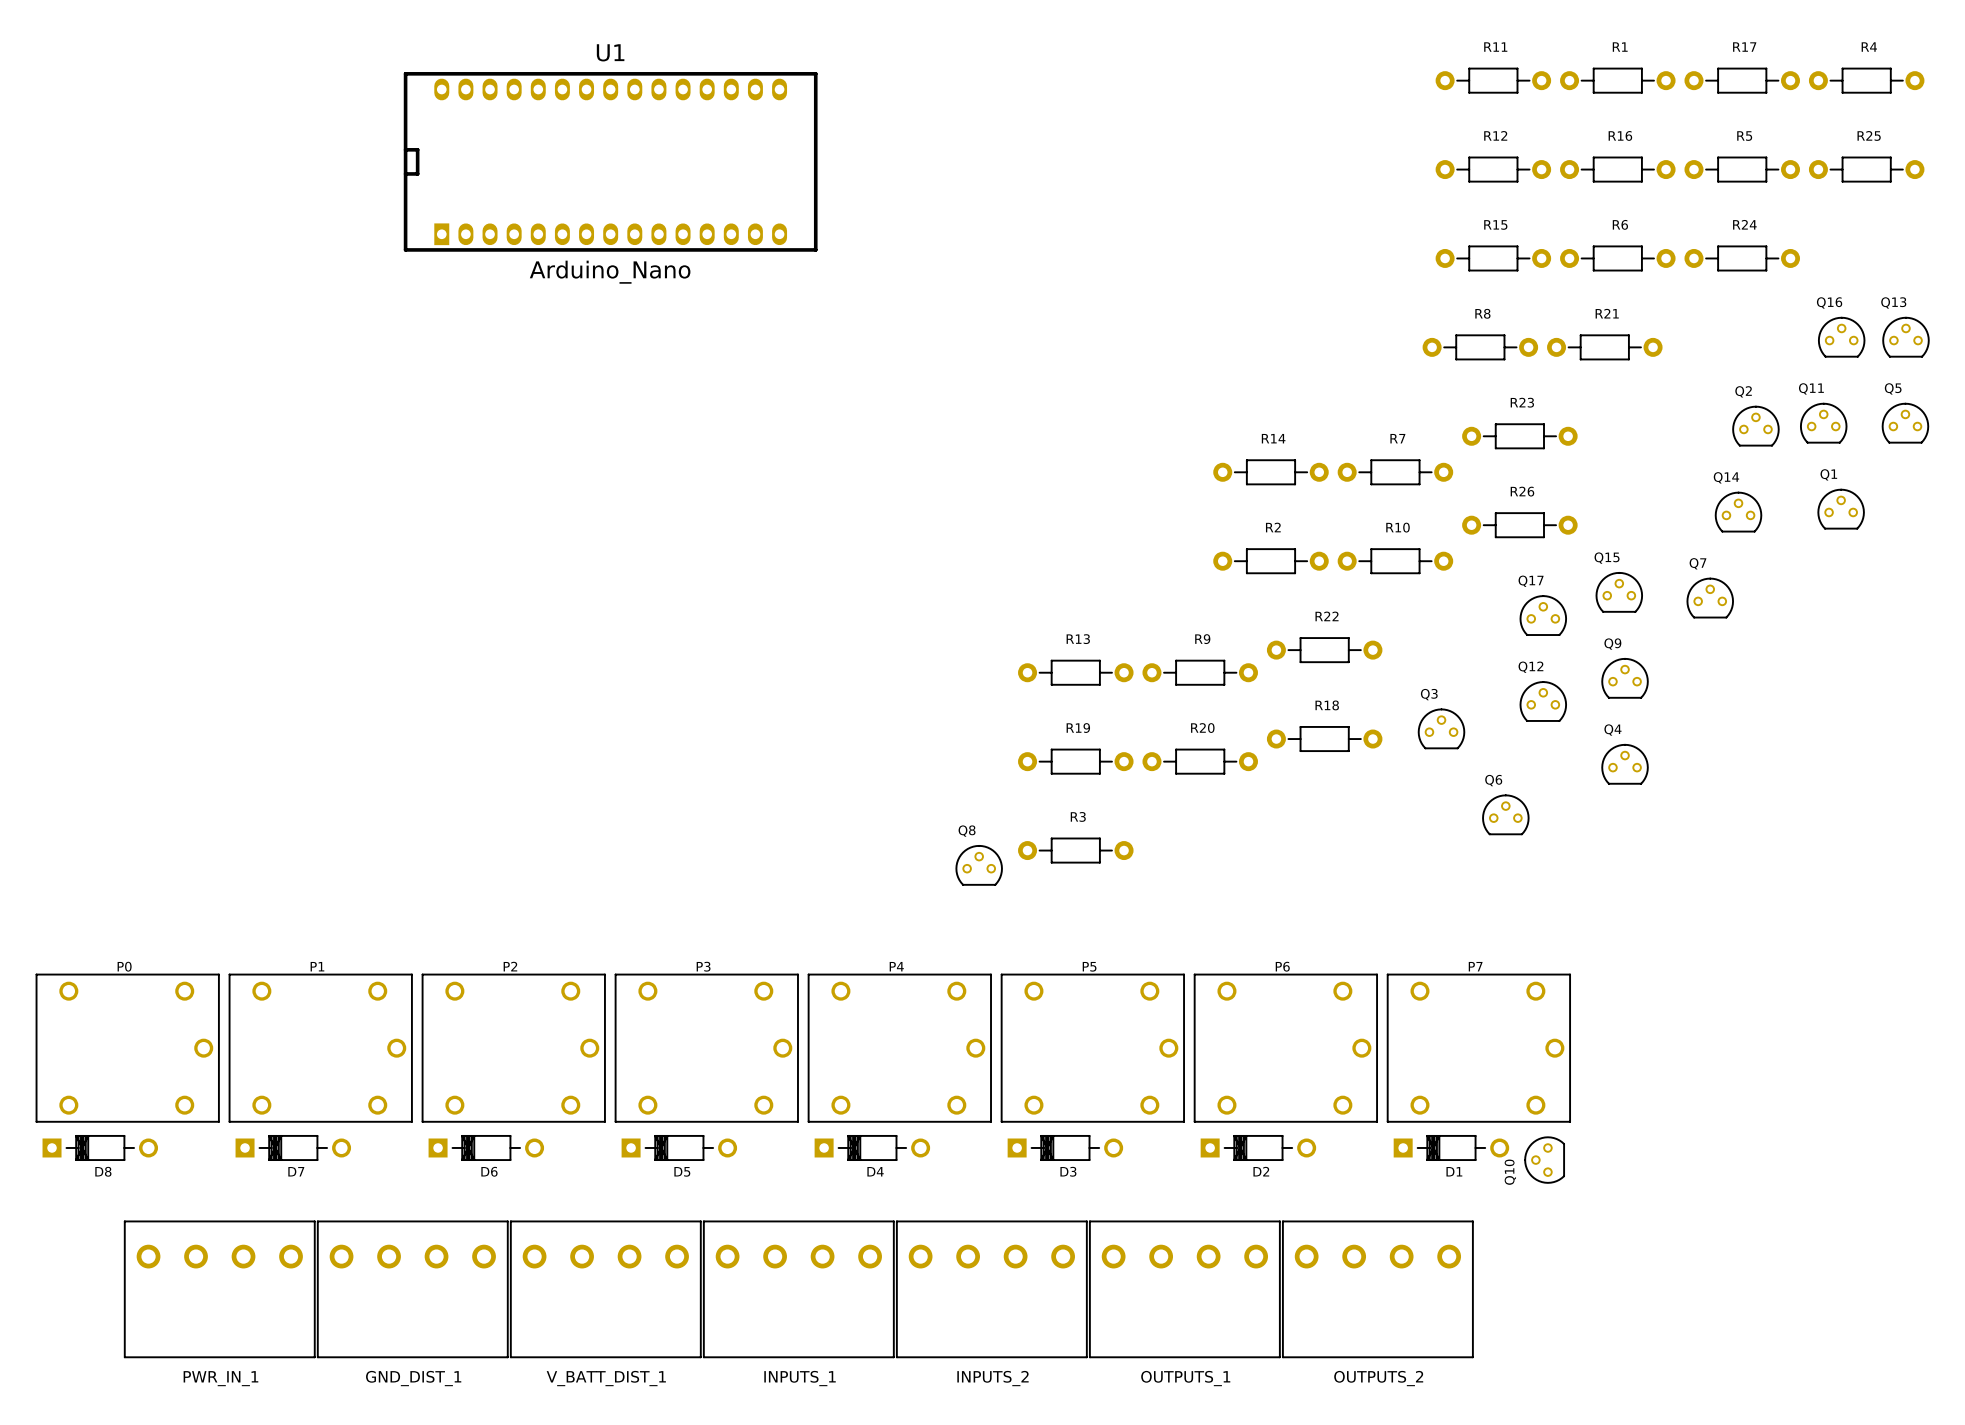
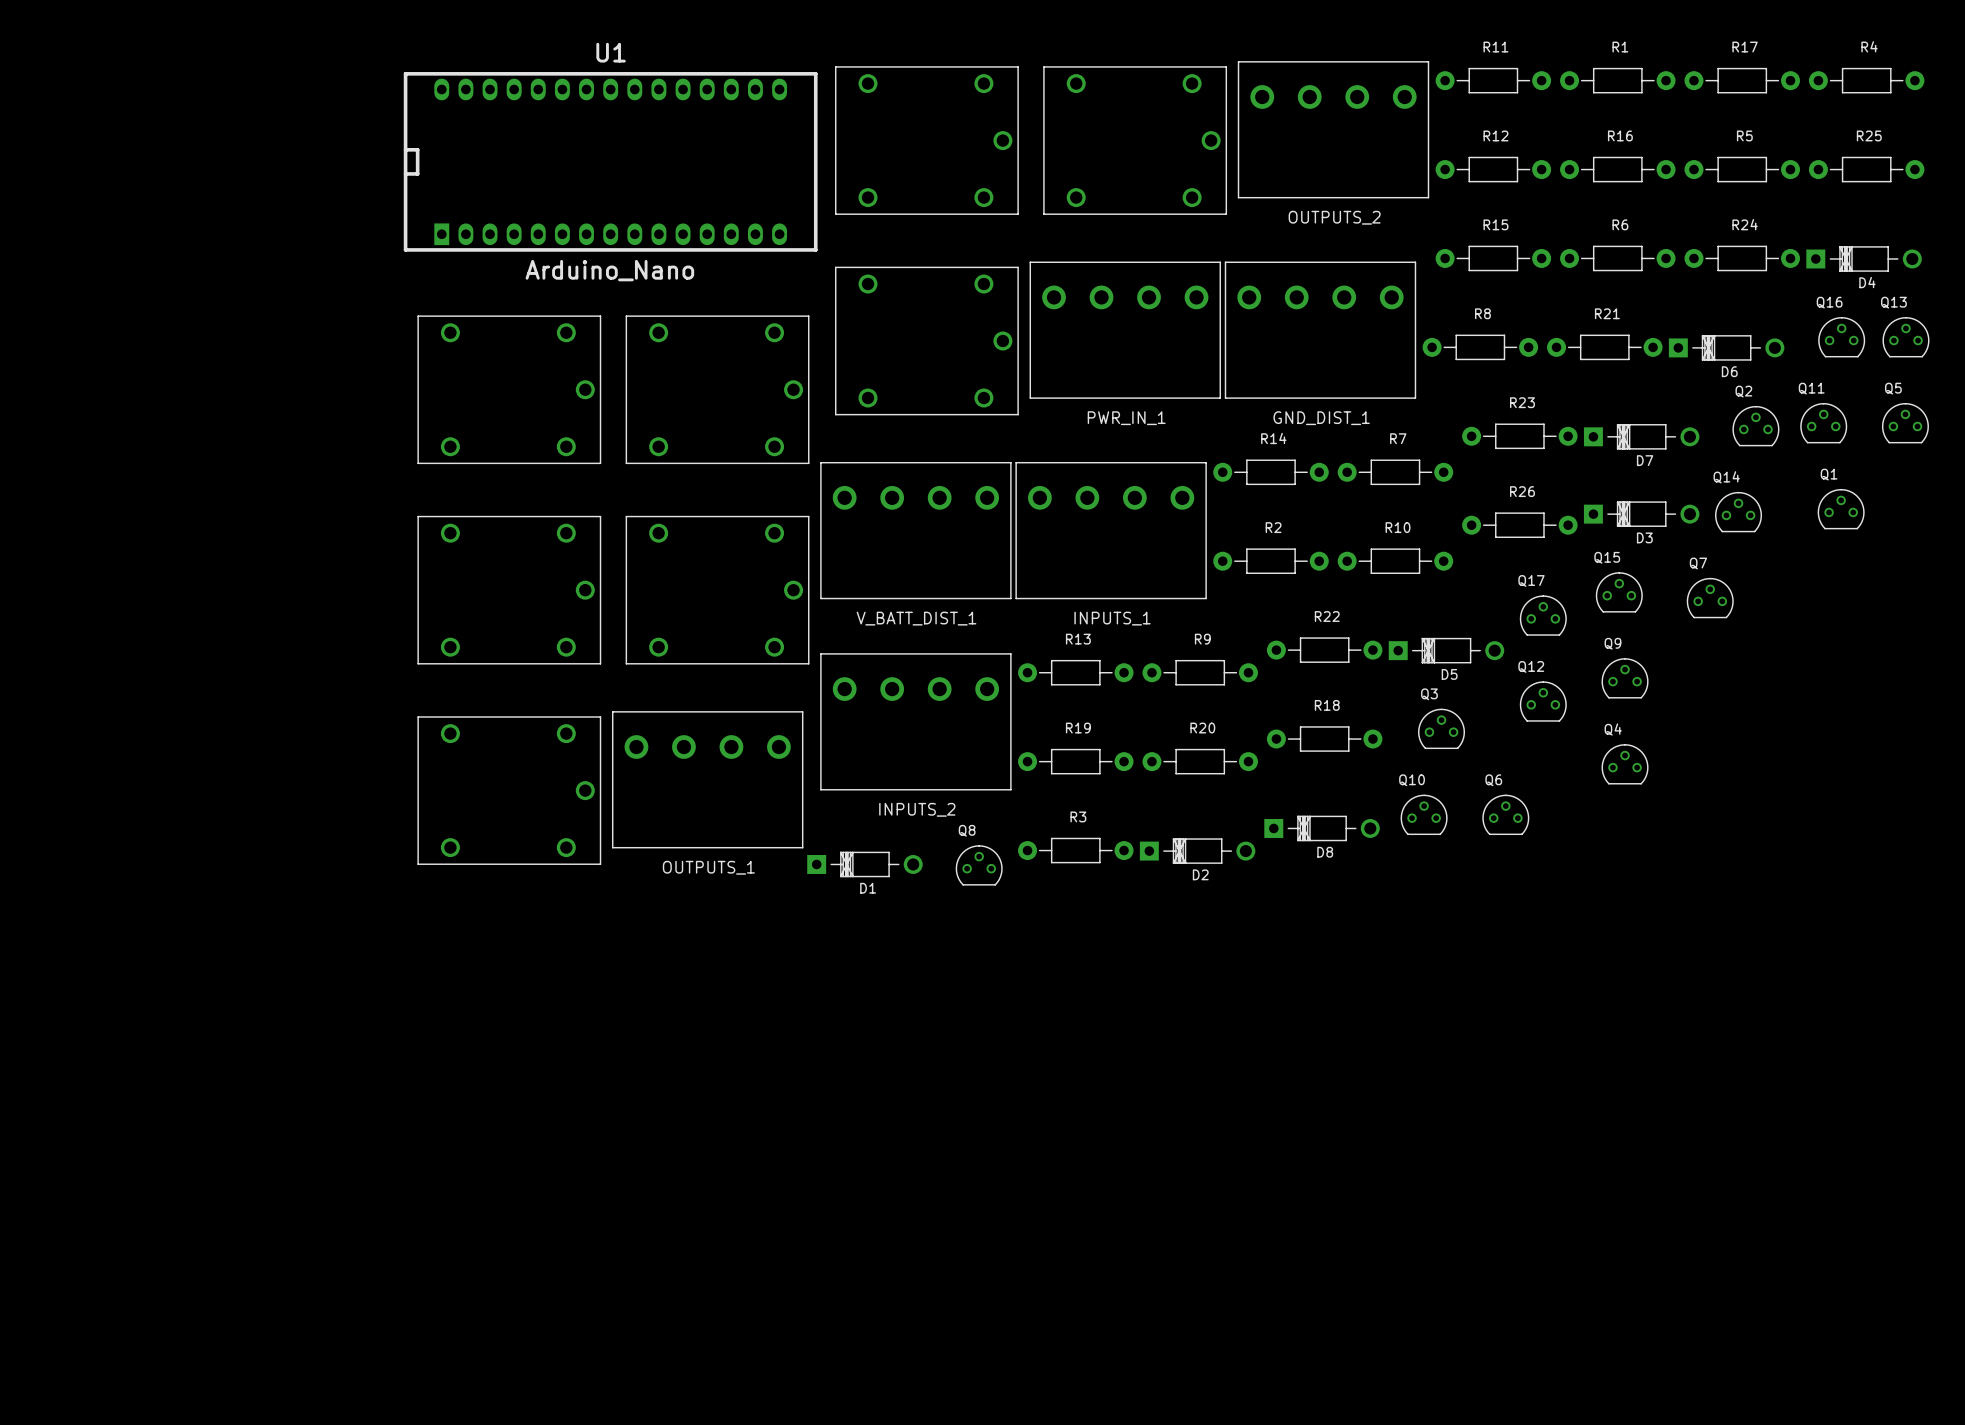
part: none -> (926, 140)
part: none -> (1135, 140)
part: none -> (926, 341)
part: none -> (509, 389)
part: none -> (717, 389)
part: none -> (509, 590)
part: none -> (717, 590)
part: none -> (509, 790)
P0: (127, 1048) -> none
P1: (320, 1048) -> none
P2: (513, 1048) -> none
P3: (706, 1048) -> none
P4: (899, 1048) -> none
P5: (1092, 1048) -> none
P6: (1285, 1048) -> none
P7: (1478, 1048) -> none
D8 position: (100, 1147) -> (1322, 828)
D7 position: (293, 1147) -> (1641, 436)
D6 position: (486, 1147) -> (1726, 347)
D5 position: (679, 1147) -> (1446, 650)
D4 position: (872, 1147) -> (1864, 259)
D3 position: (1065, 1147) -> (1641, 514)
D2 position: (1258, 1147) -> (1197, 851)
D1 position: (1451, 1147) -> (864, 864)
Q10 rotation: 0° (1544, 1160) -> 90° clockwise (1424, 814)
Q10 position: (1544, 1160) -> (1424, 814)
PWR_IN_1 position: (219, 1289) -> (1125, 330)
GND_DIST_1 position: (412, 1289) -> (1320, 330)
V_BATT_DIST_1 position: (605, 1289) -> (915, 530)
INPUTS_1 position: (798, 1289) -> (1111, 530)
INPUTS_2 position: (991, 1289) -> (915, 721)
OUTPUTS_1 position: (1184, 1289) -> (707, 779)
OUTPUTS_2 position: (1377, 1289) -> (1333, 129)

